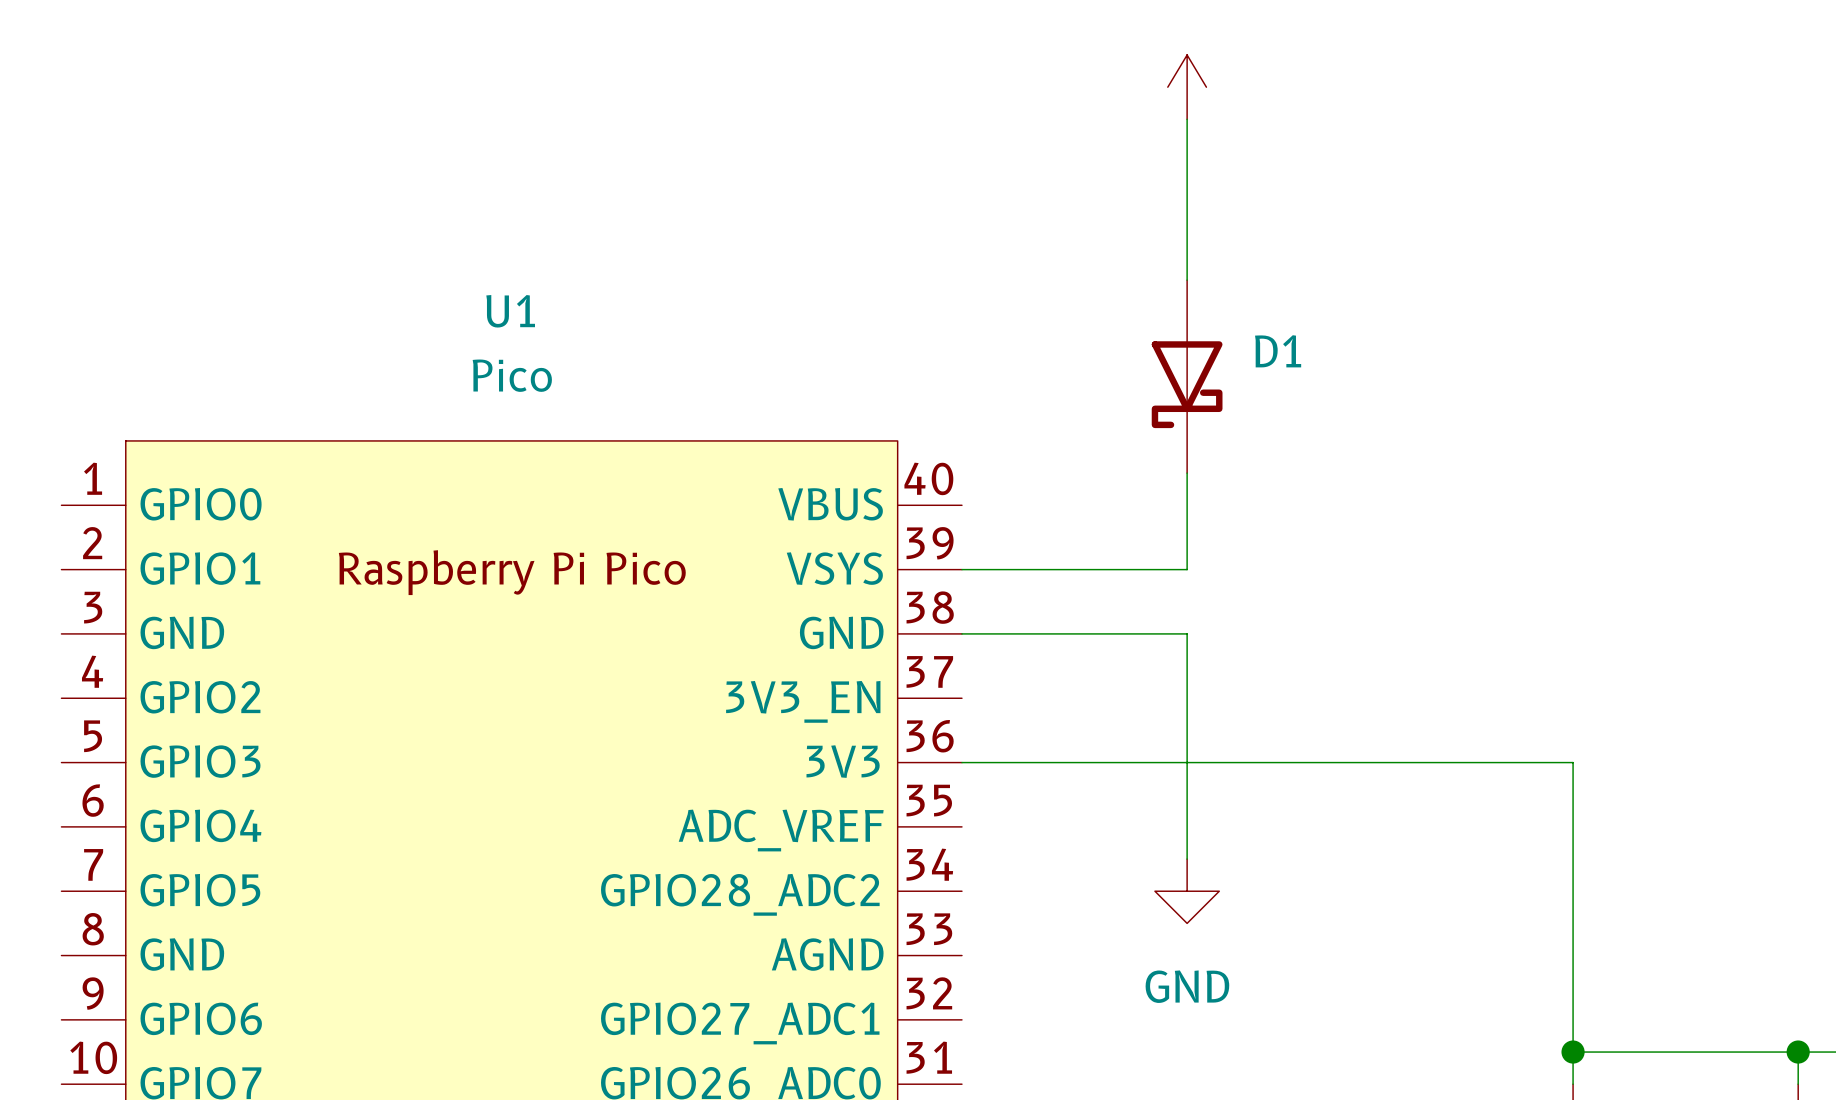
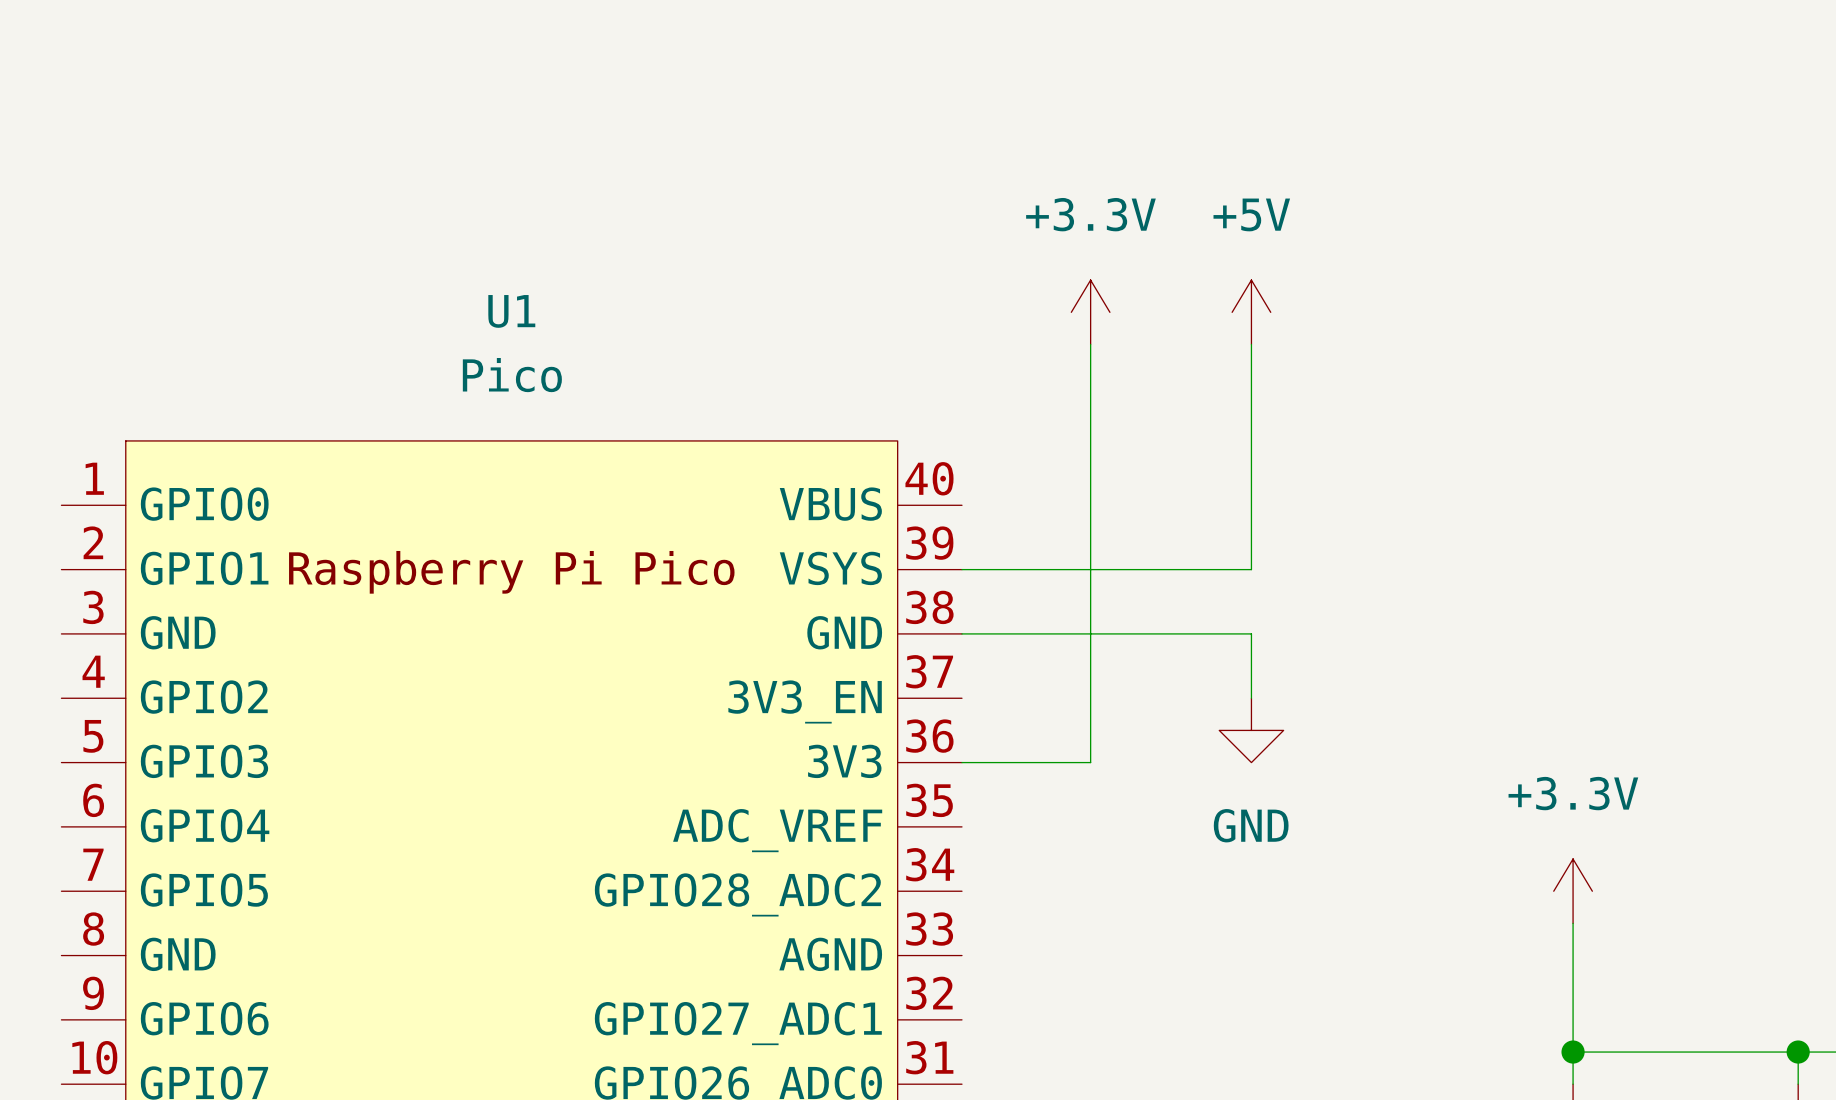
power symbol: (1187, 87) -> none
wire: (1187, 119) (1187, 280) -> none
power symbol: none -> +3.3V (1090, 312)
power symbol: none -> +5V (1251, 312)
D1: (1187, 376) -> none
wire: (1187, 473) (1187, 569) -> (1251, 344) (1251, 569) (1187, 569)
wire: (1187, 633) (1187, 859) -> (1187, 633) (1251, 633) (1251, 698)
wire: (1090, 762) (1573, 762) (1573, 923) -> (1090, 762) (1090, 344)
power symbol position: GND (1187, 891) -> GND (1251, 730)
power symbol: none -> +3.3V (1573, 891)

